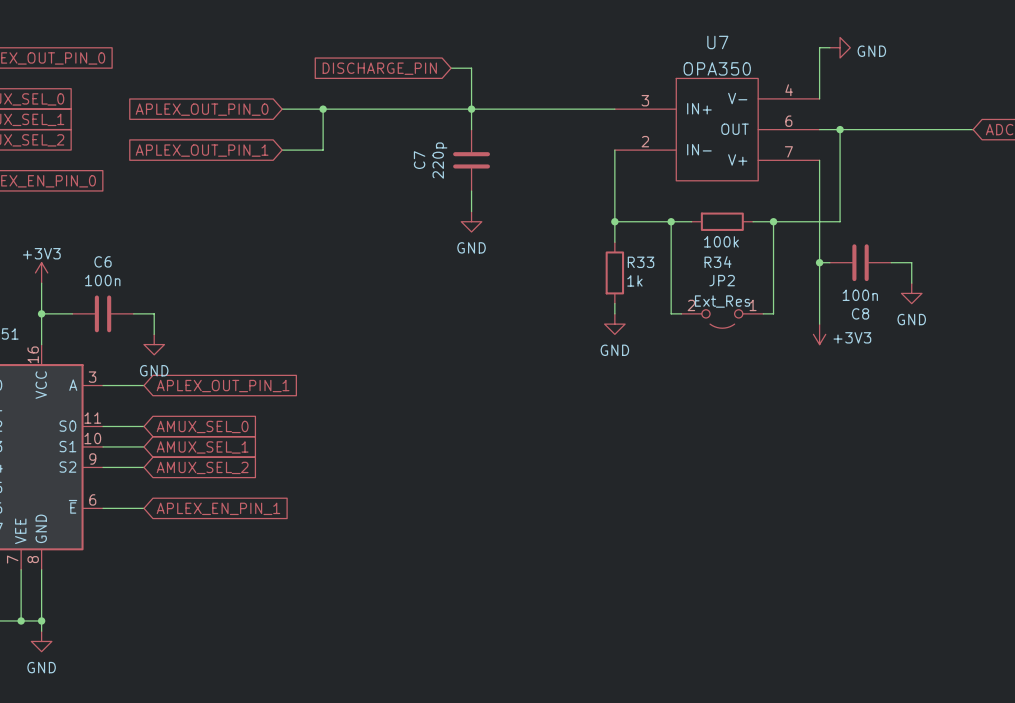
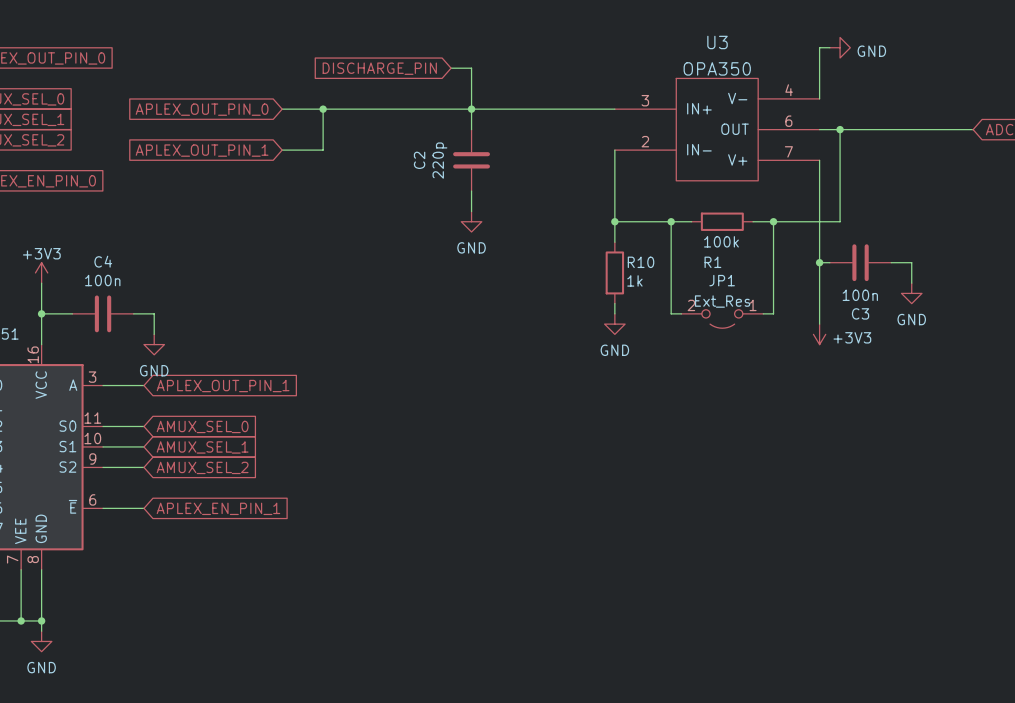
U7 name: U7 (717, 42) -> U3 (717, 42)
C7 name: C7 (419, 160) -> C2 (419, 160)
C6 name: C6 (103, 261) -> C4 (103, 261)
R33 name: R33 (641, 262) -> R10 (641, 262)
R34 name: R34 (718, 262) -> R1 (712, 262)
JP2 name: JP2 (722, 280) -> JP1 (722, 280)
C8 name: C8 (860, 313) -> C3 (860, 313)

